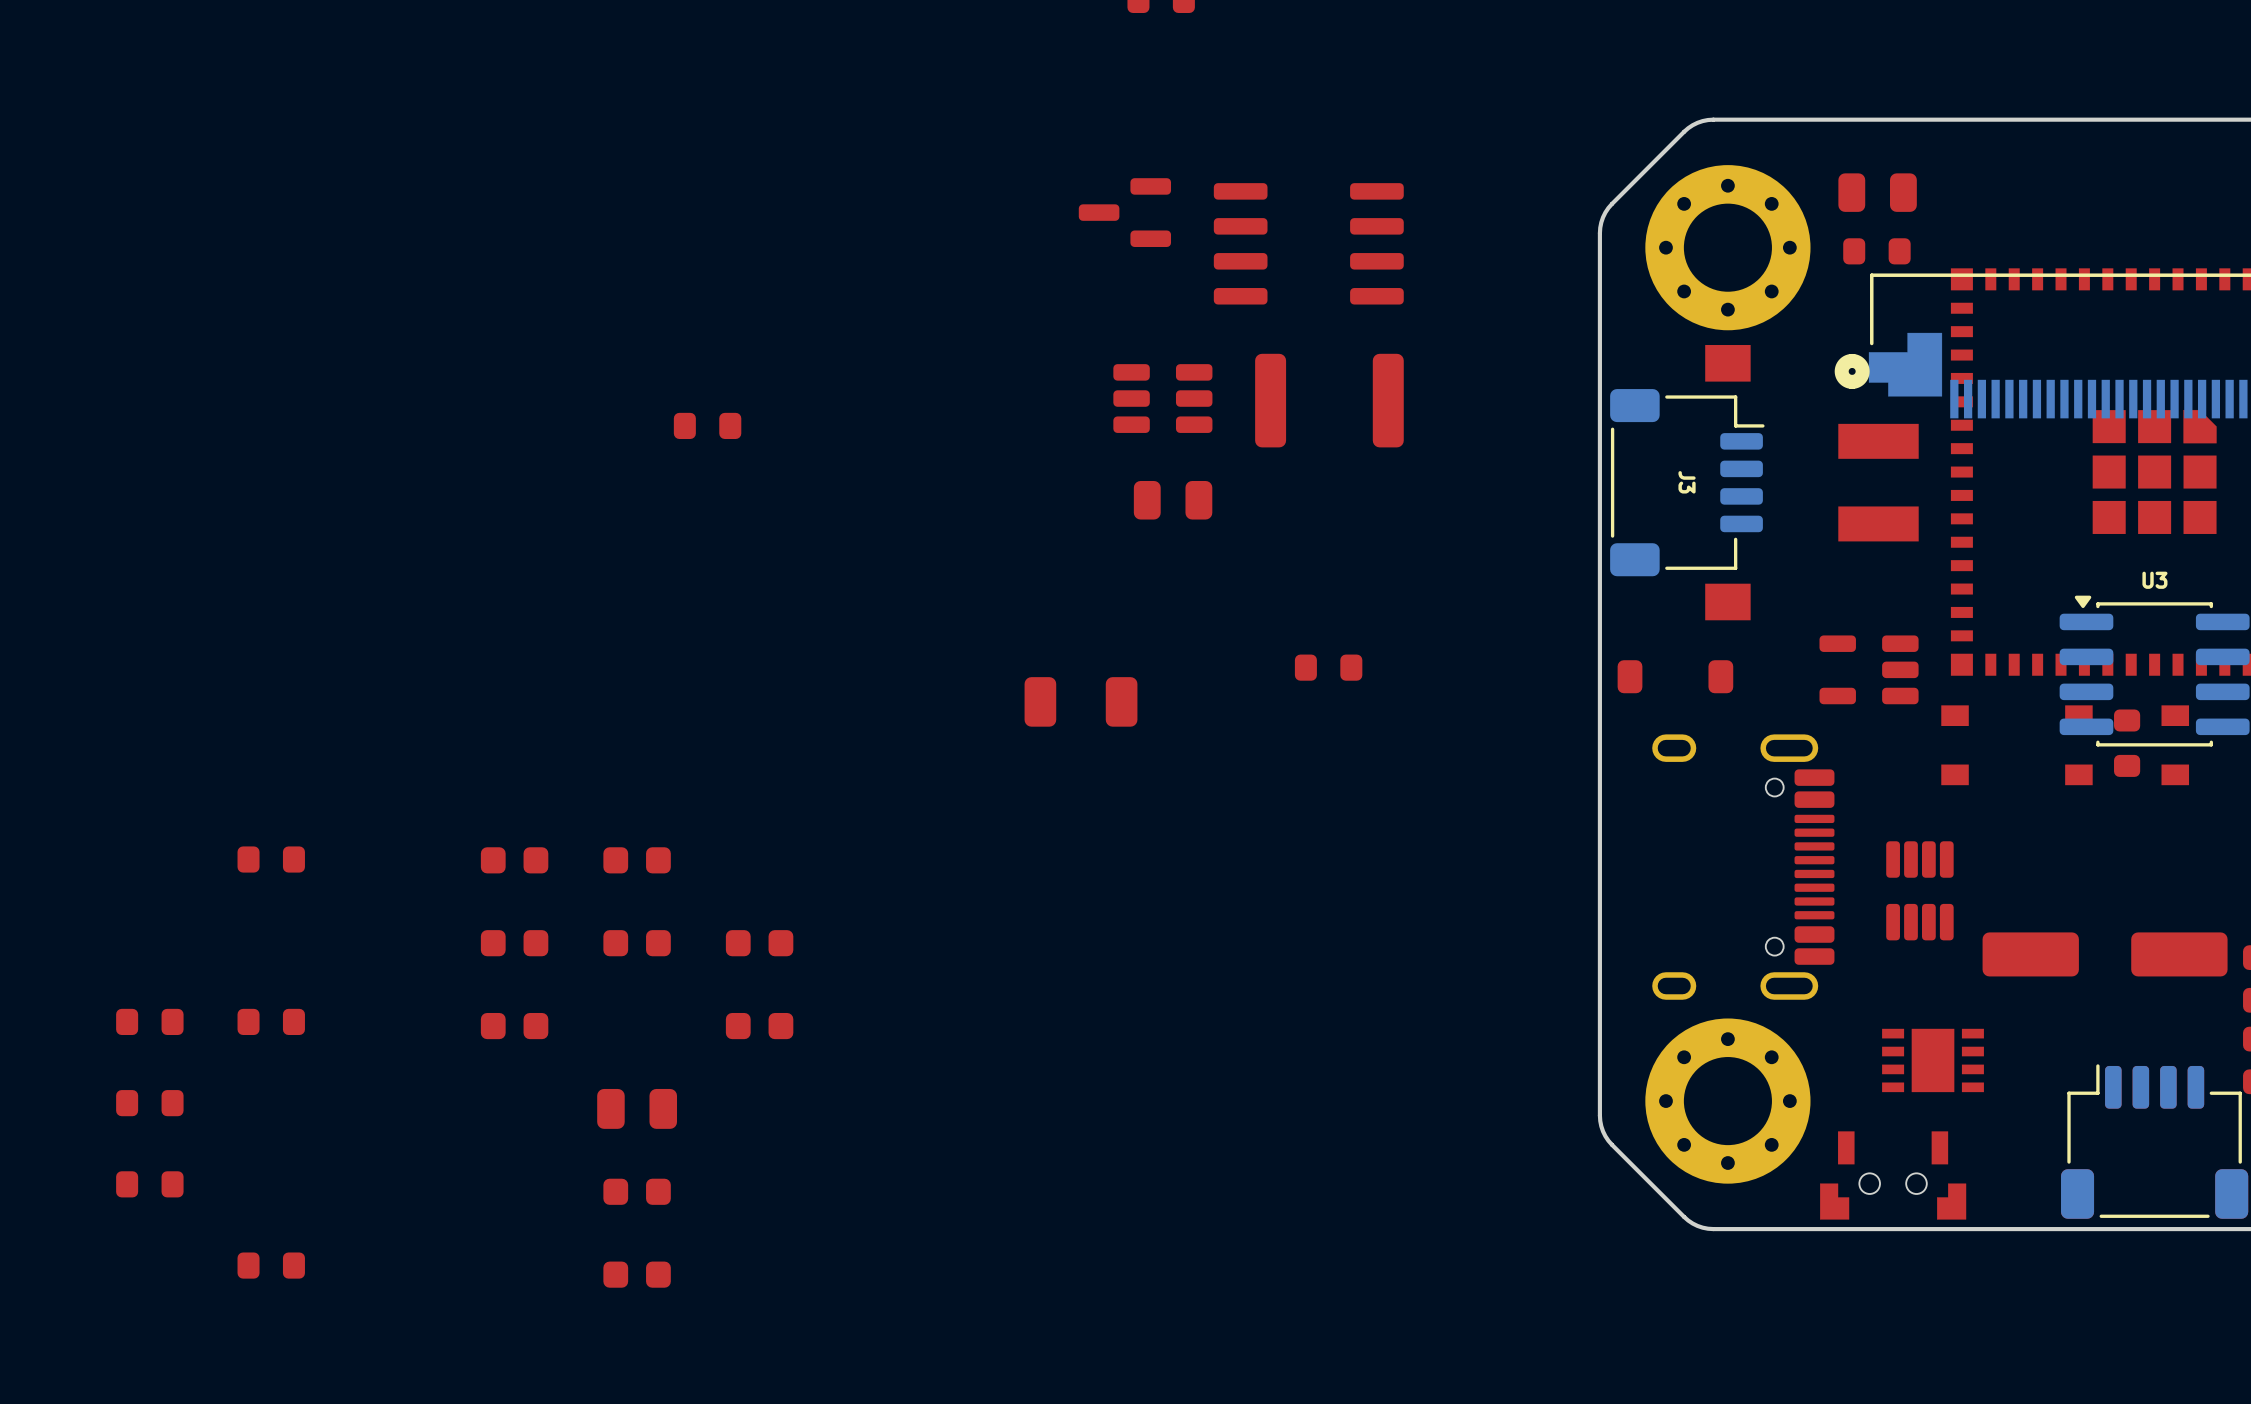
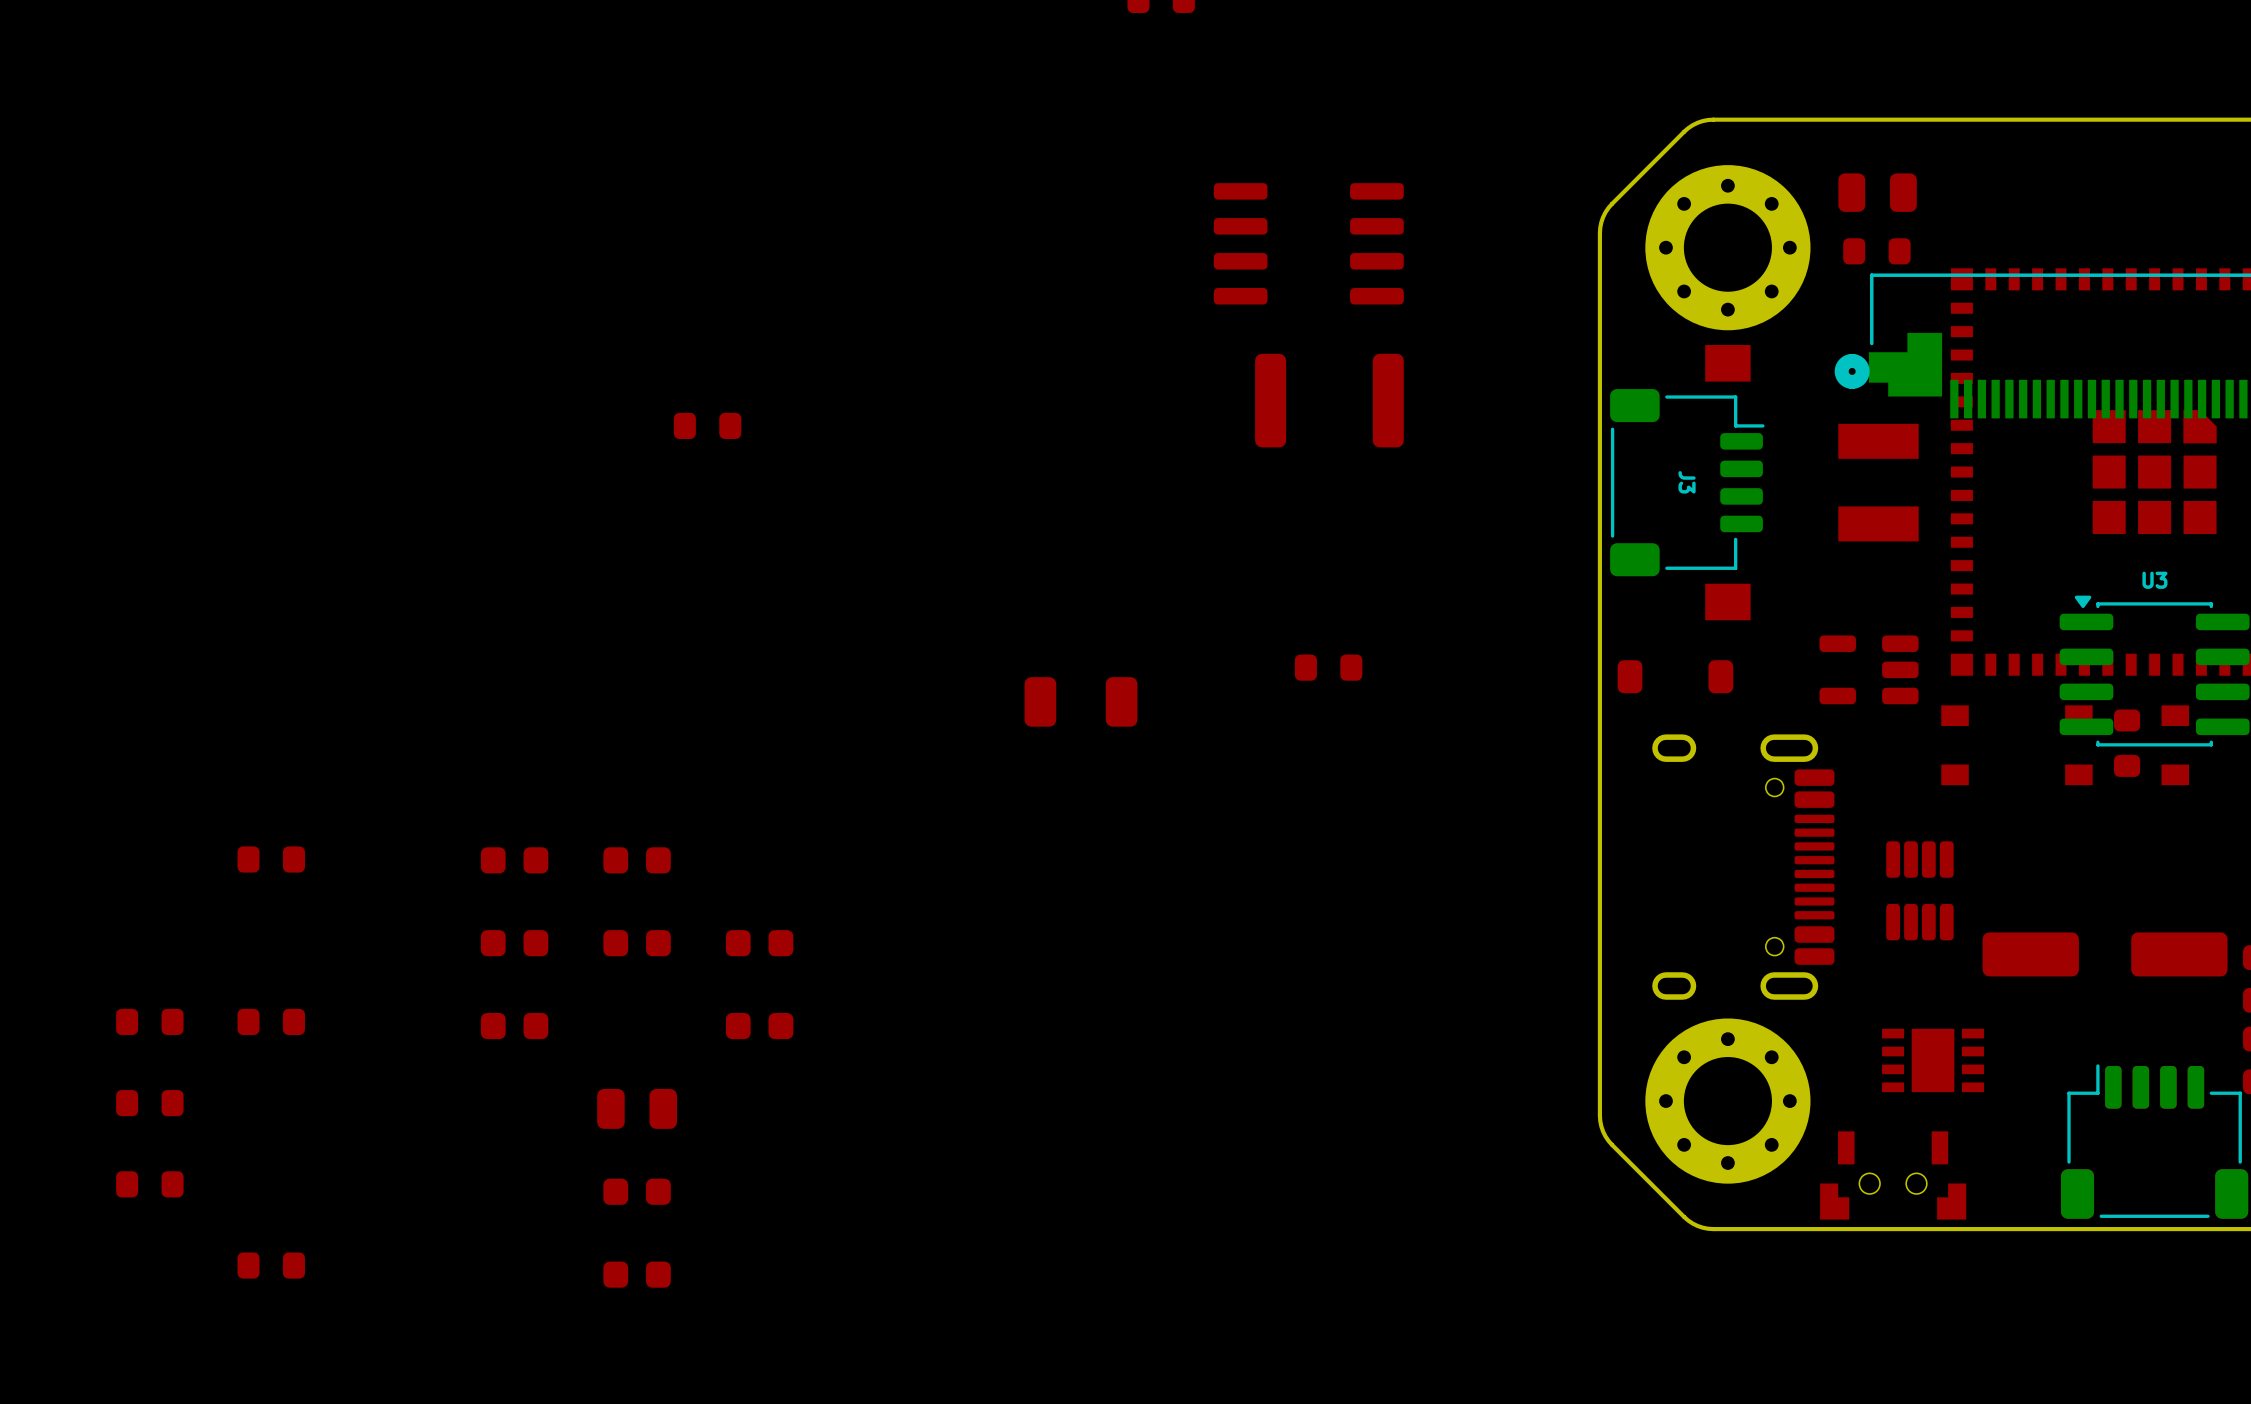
part: (1124, 212) -> none
part: (1162, 398) -> none
part: (1173, 500) -> none

